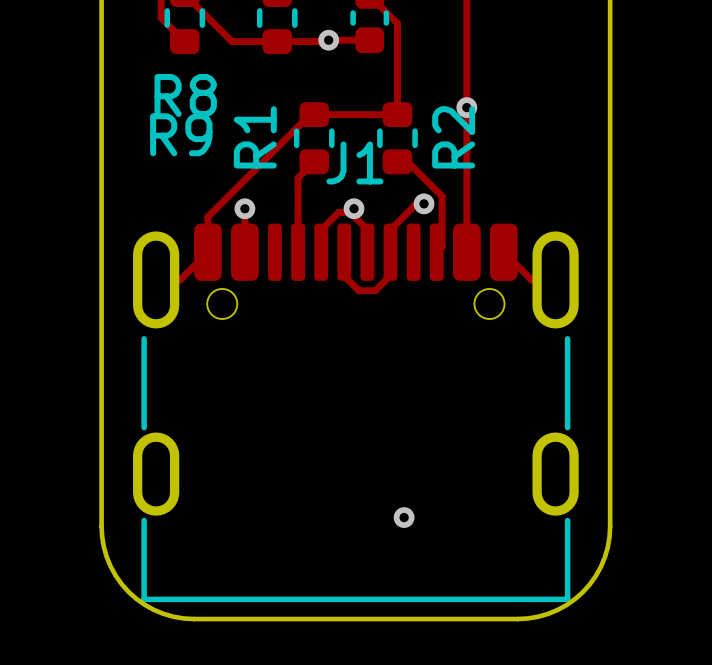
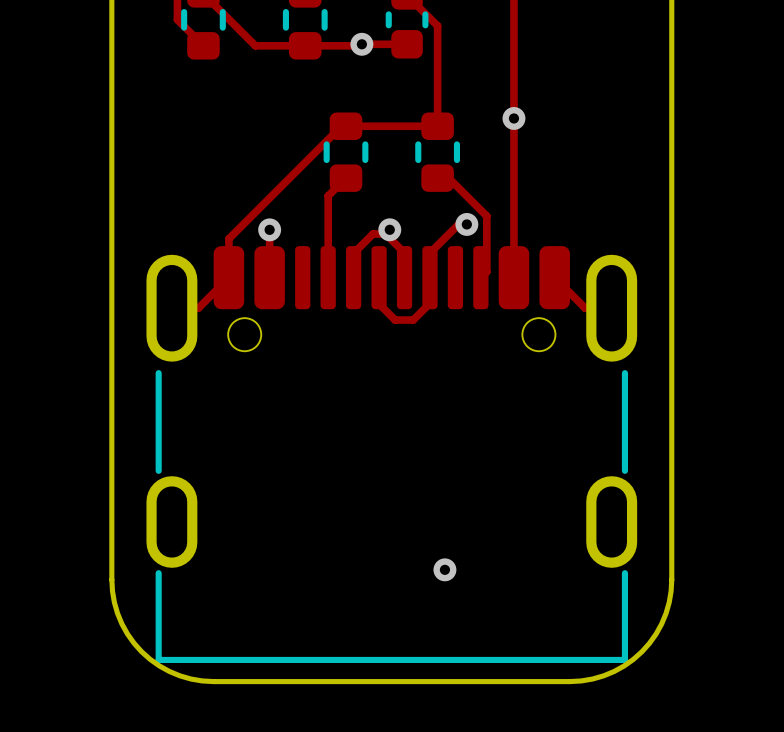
R8 name: R8 (185, 95) -> none
R9 name: R9 (181, 134) -> none
R1 name: R1 (255, 137) -> none
R2 name: R2 (453, 137) -> none
J1 name: J1 (354, 162) -> none

